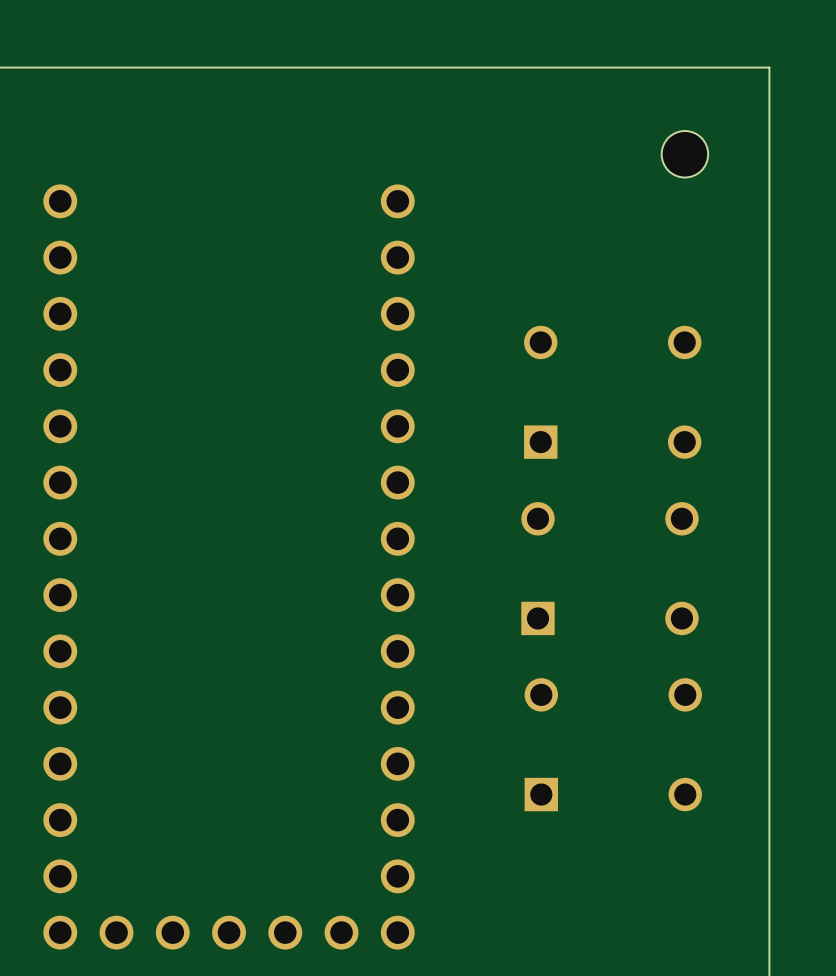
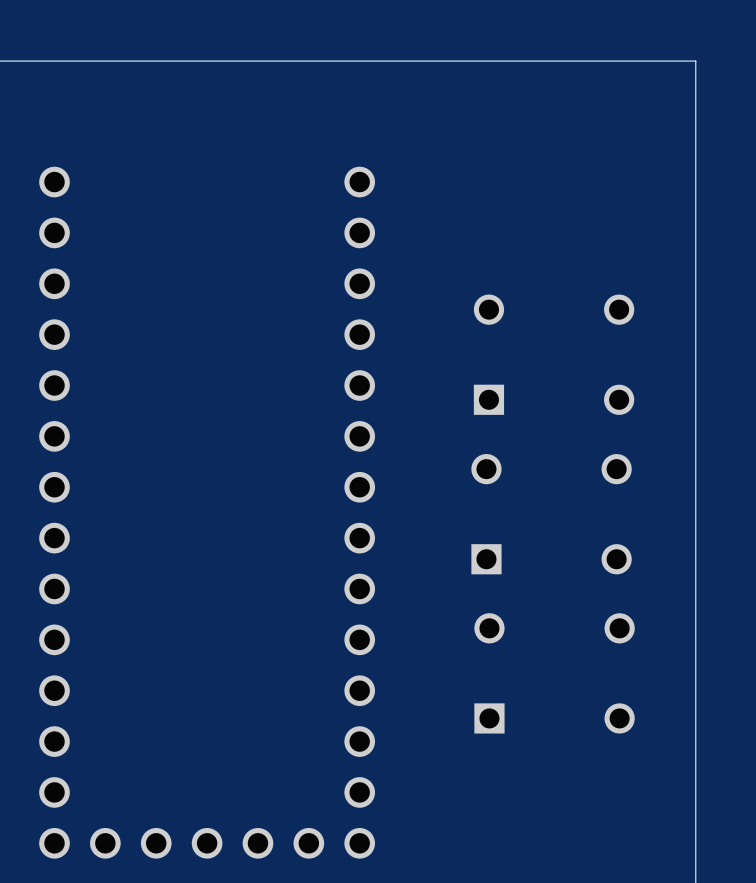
part: (684, 154) -> none

